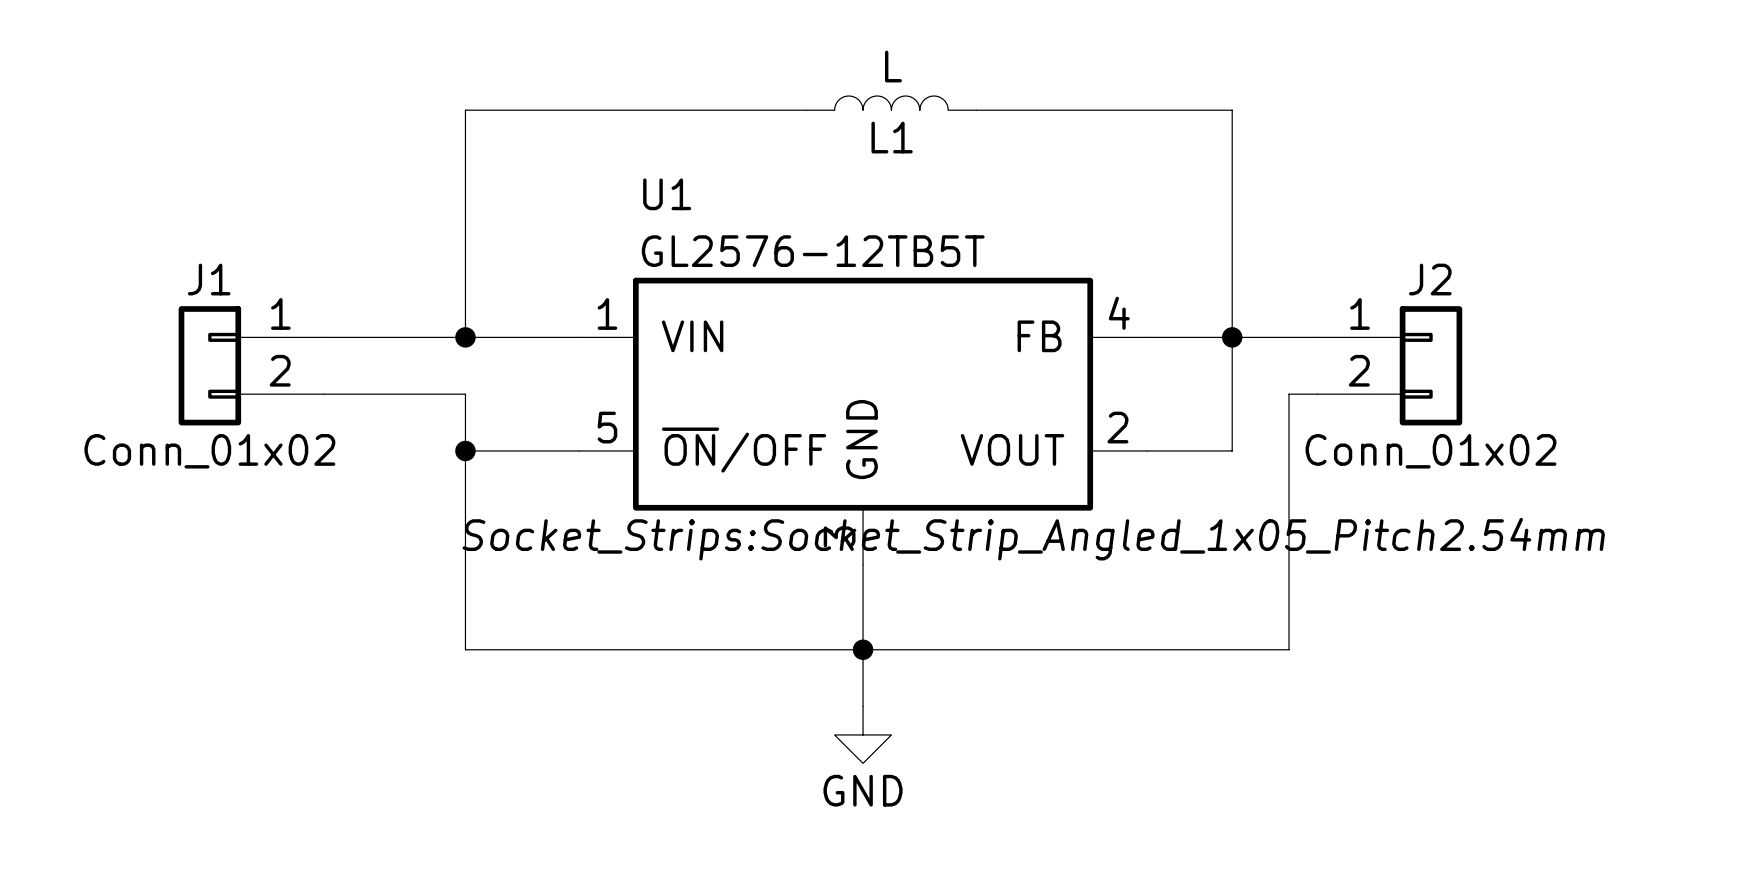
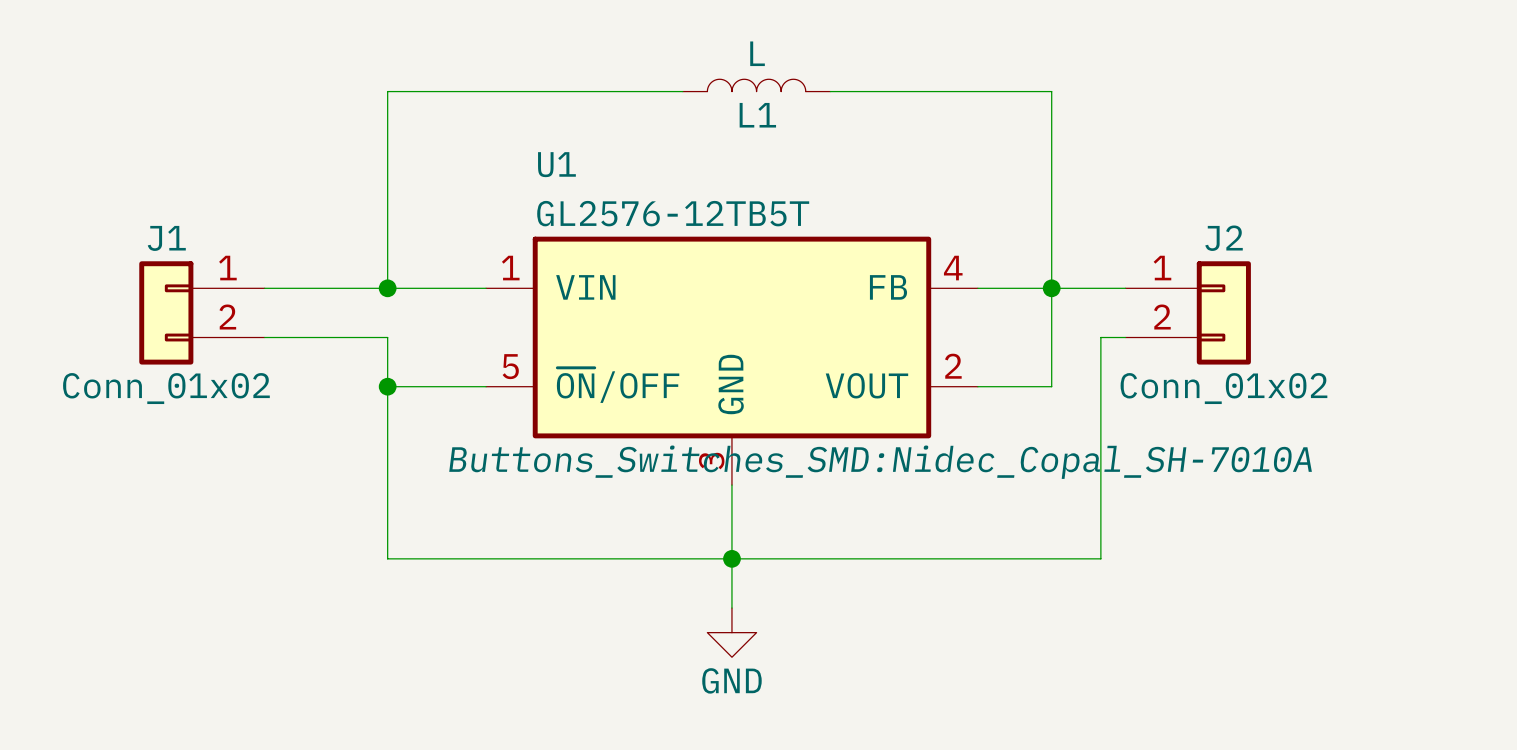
U1 text: Socket_Strips:Socket_Strip_Angled_1x05_Pitch2.54mm (1033, 539) -> Buttons_Switches_SMD:Nidec_Copal_SH-7010A (880, 462)

